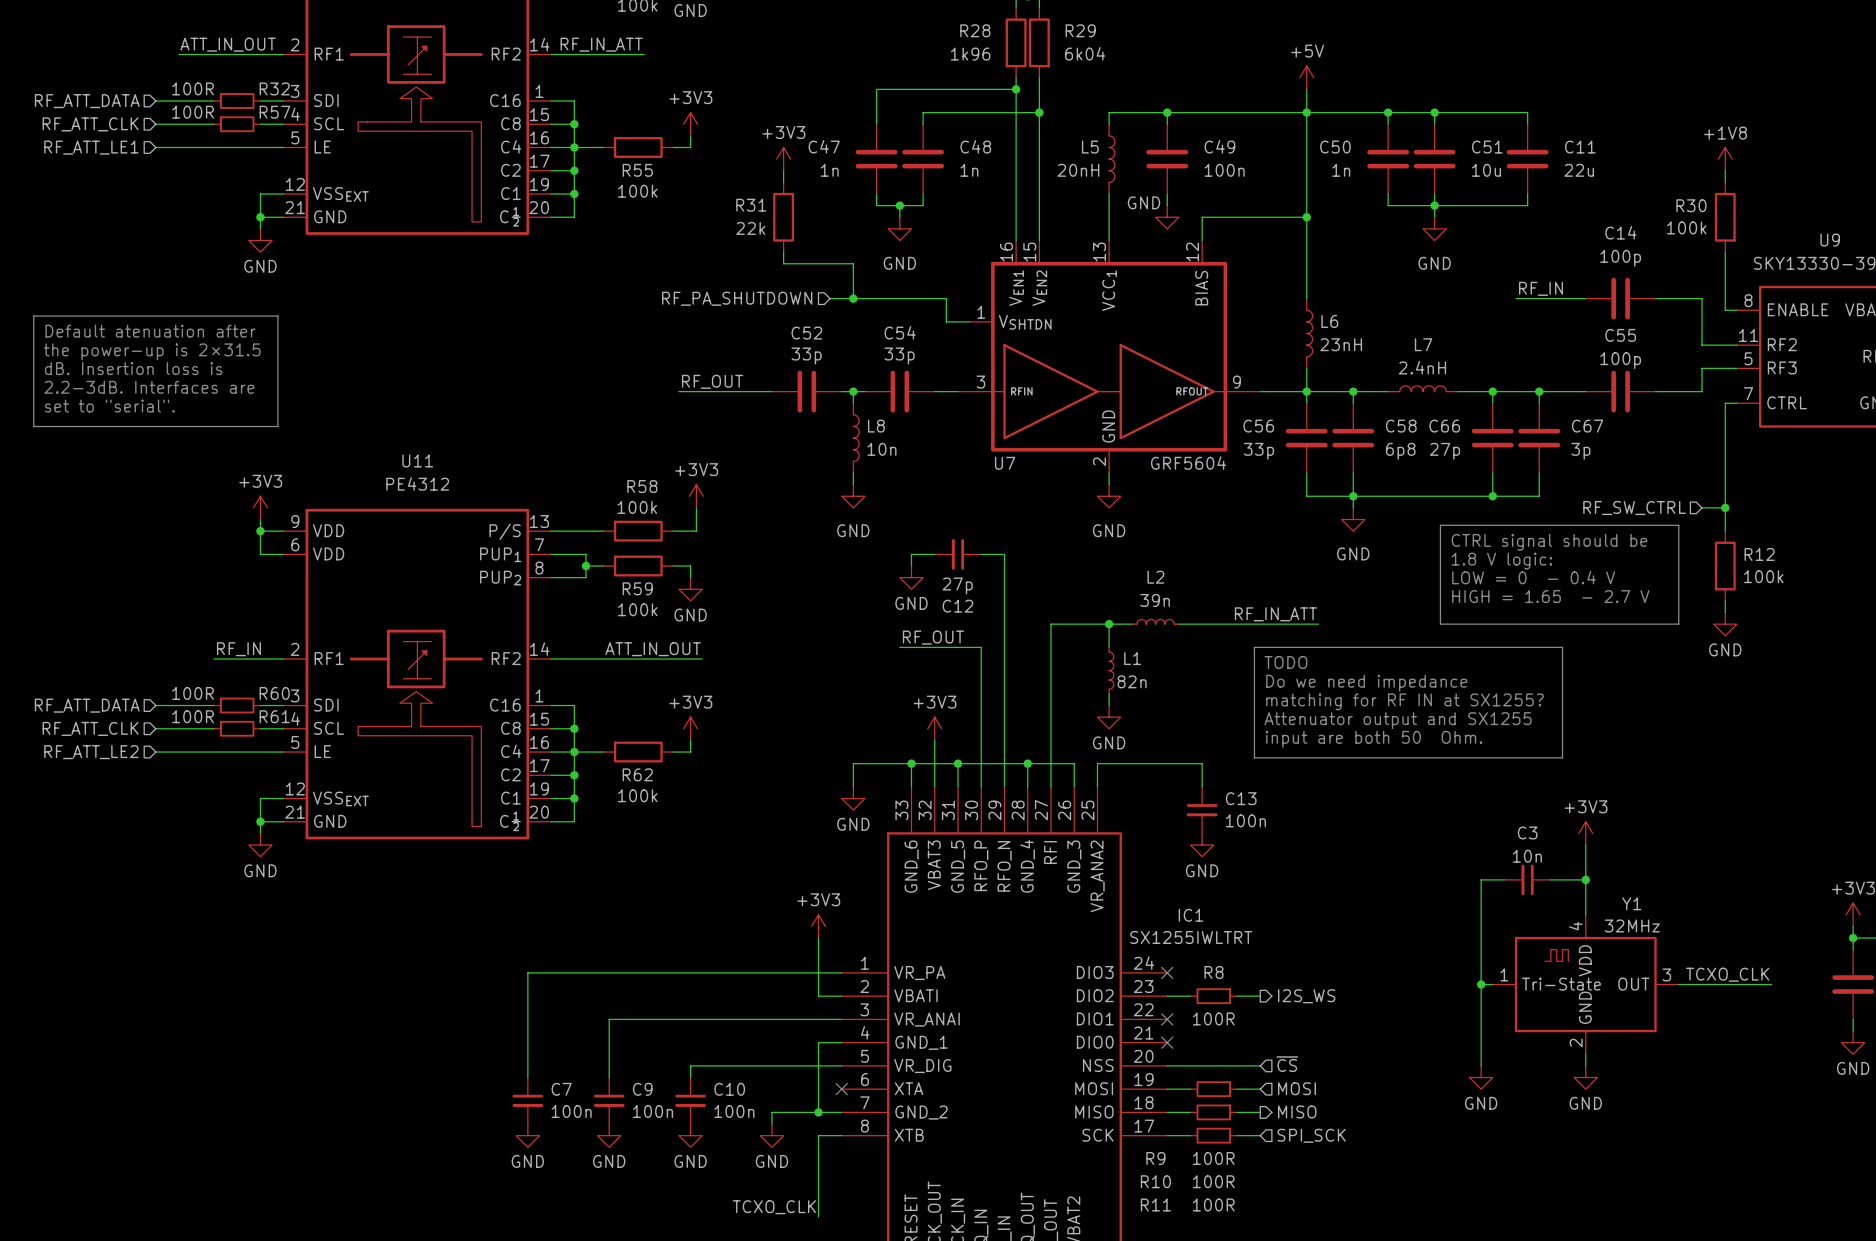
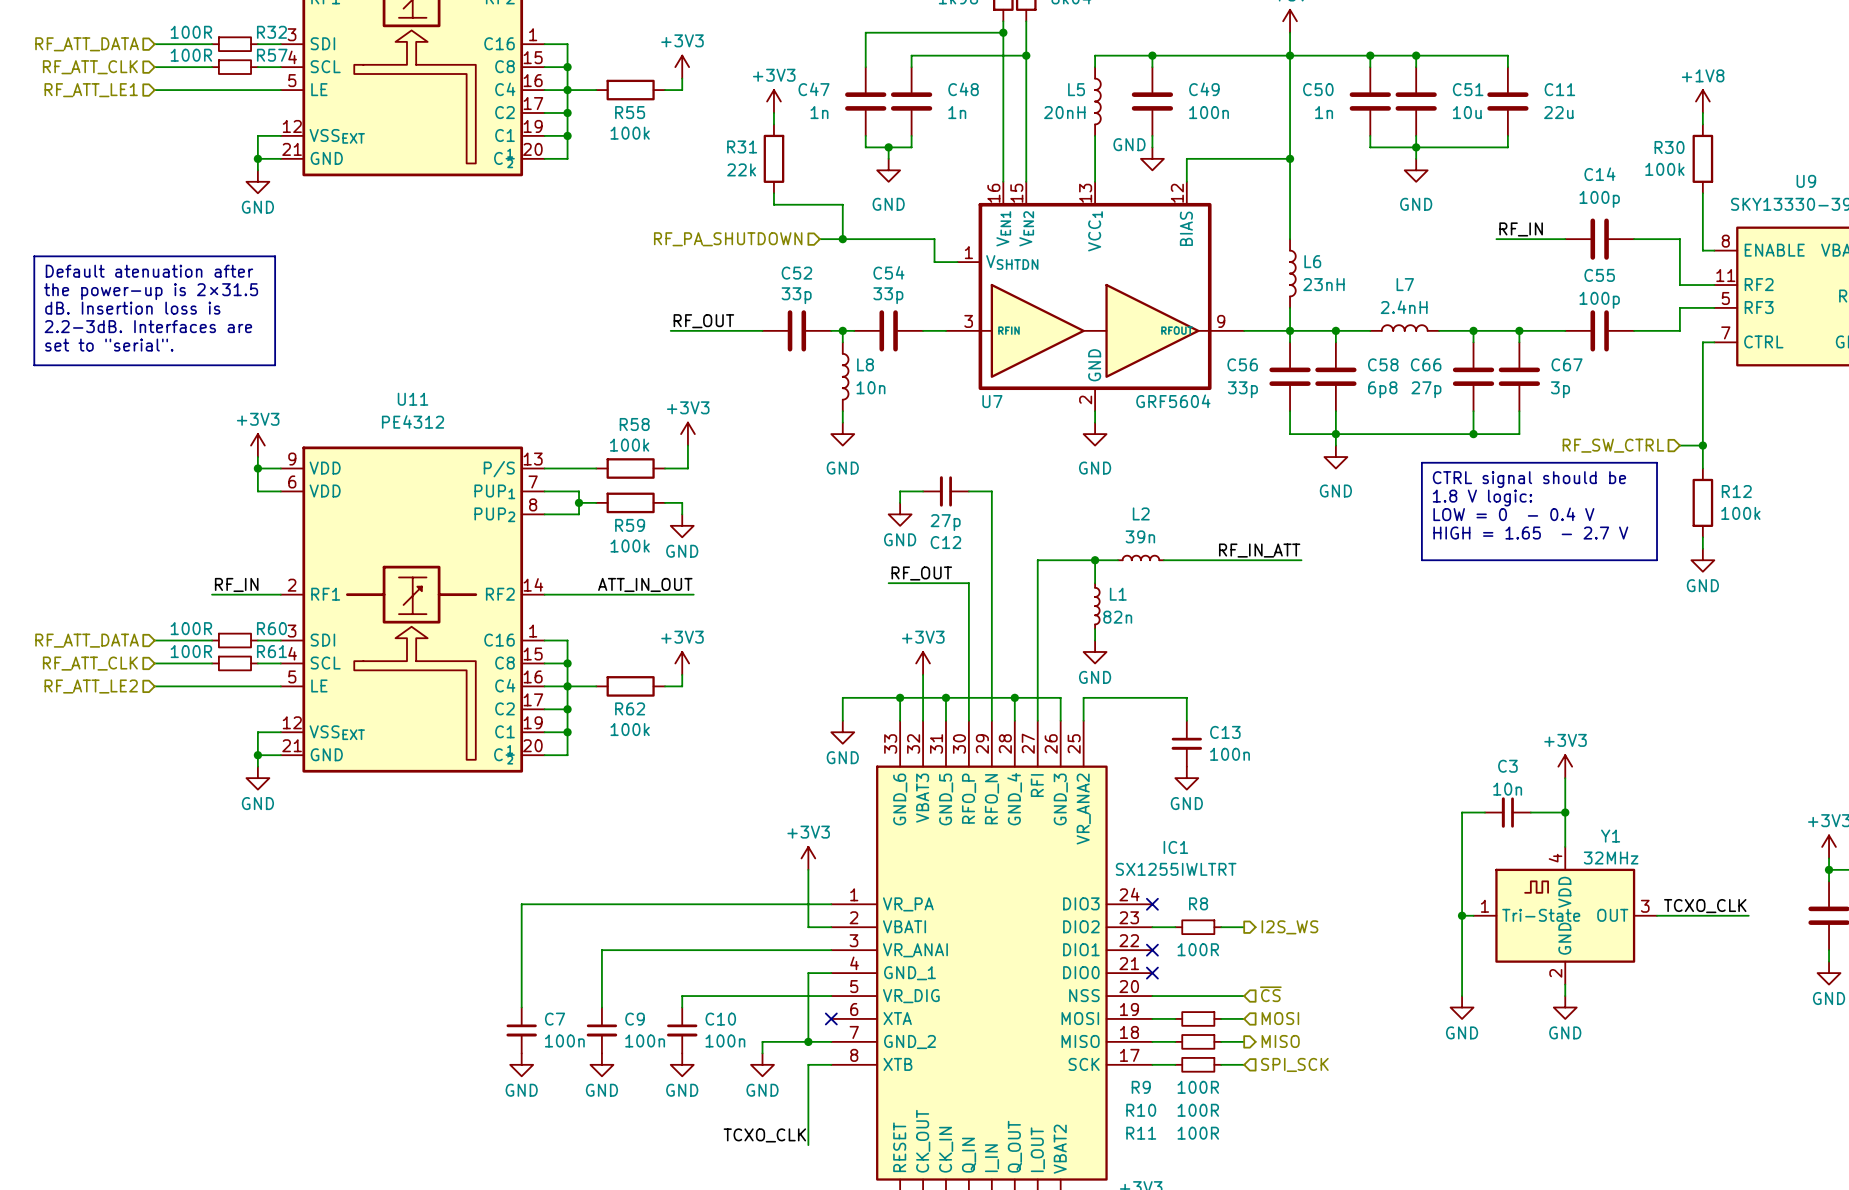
line: (1254, 647) (1562, 647) (1562, 757) (1254, 757) (1254, 647) -> none
text: TODO (1285, 662) -> none
text: Do we need impedance (1366, 683) -> none
text: matching for RF IN at SX1255? (1404, 701) -> none
text: Attenuator output and SX1255 (1398, 720) -> none
text: input are both 50 Ohm. (1373, 739) -> none

